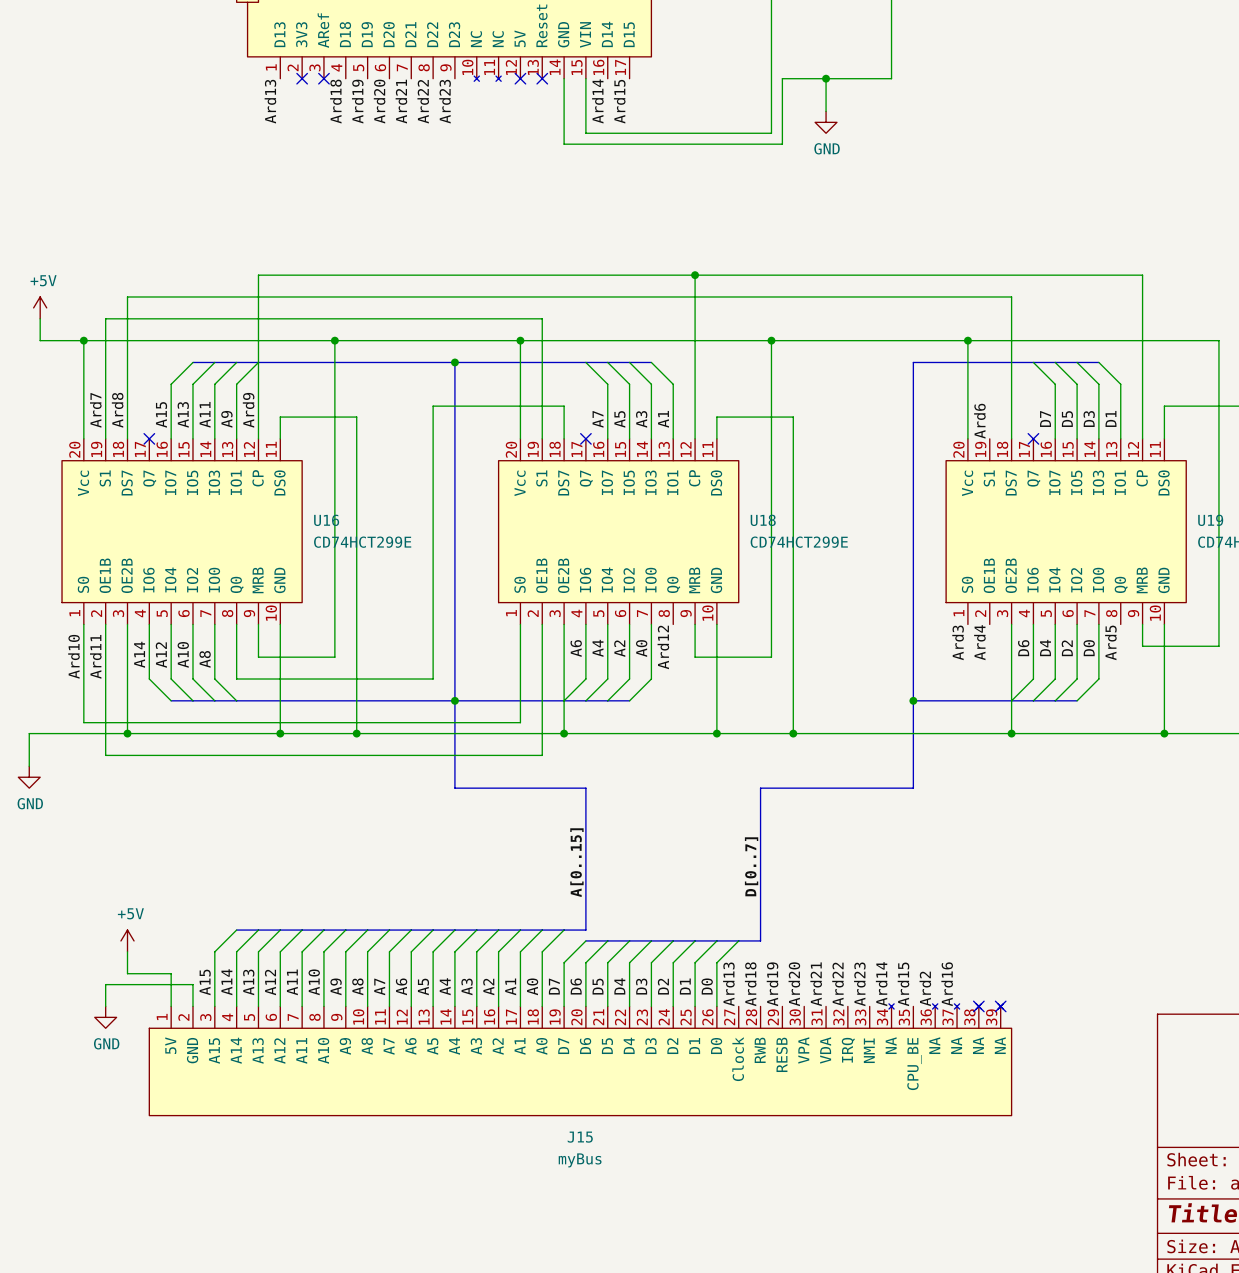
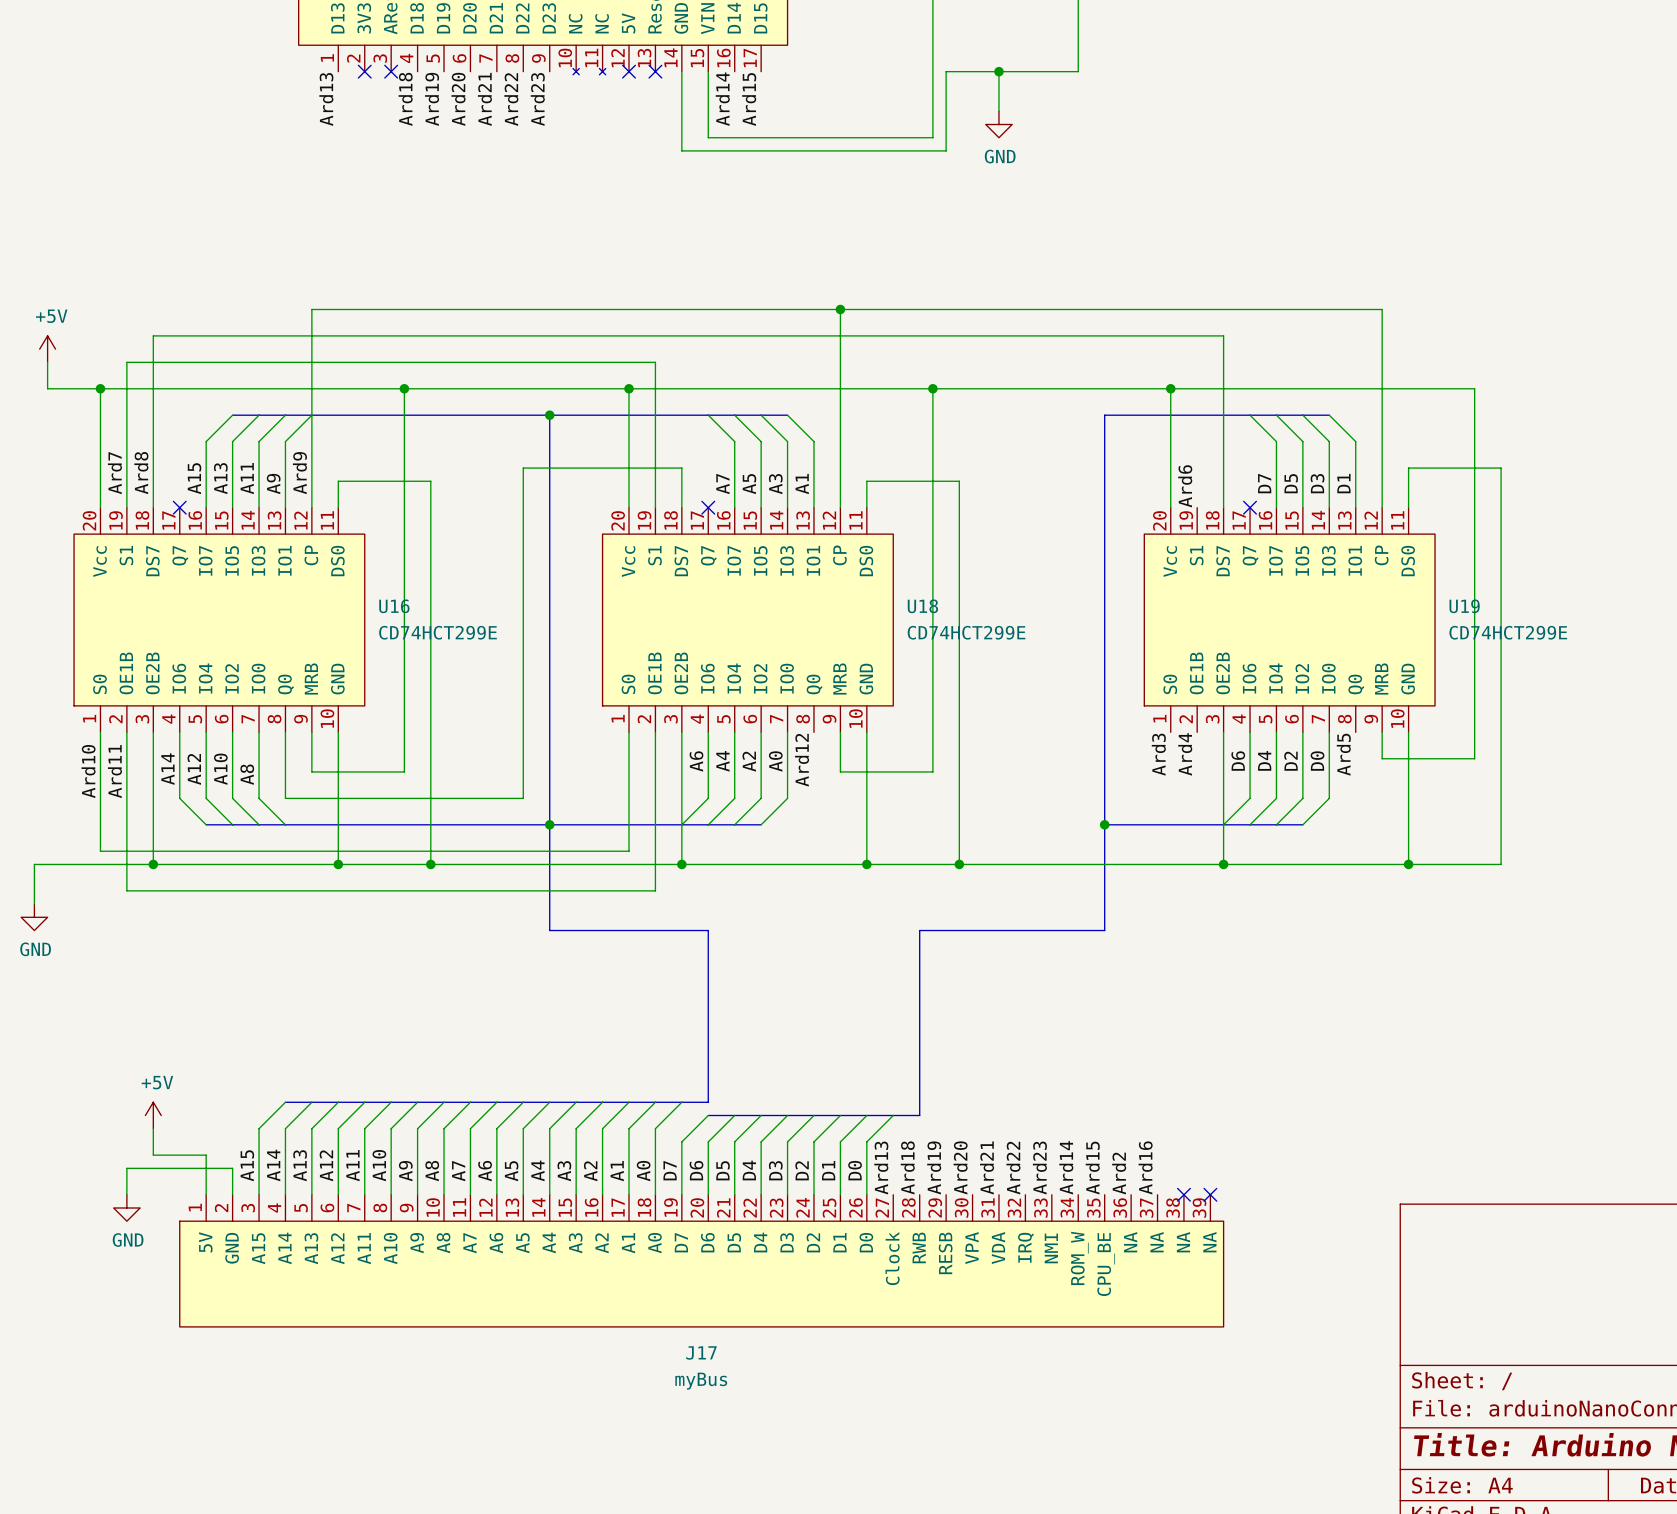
label: A[0..15] (576, 862) -> none
label: D[0..7] (751, 866) -> none
J15: myBus (580, 1059) -> none
J17: none -> myBus (701, 1260)

